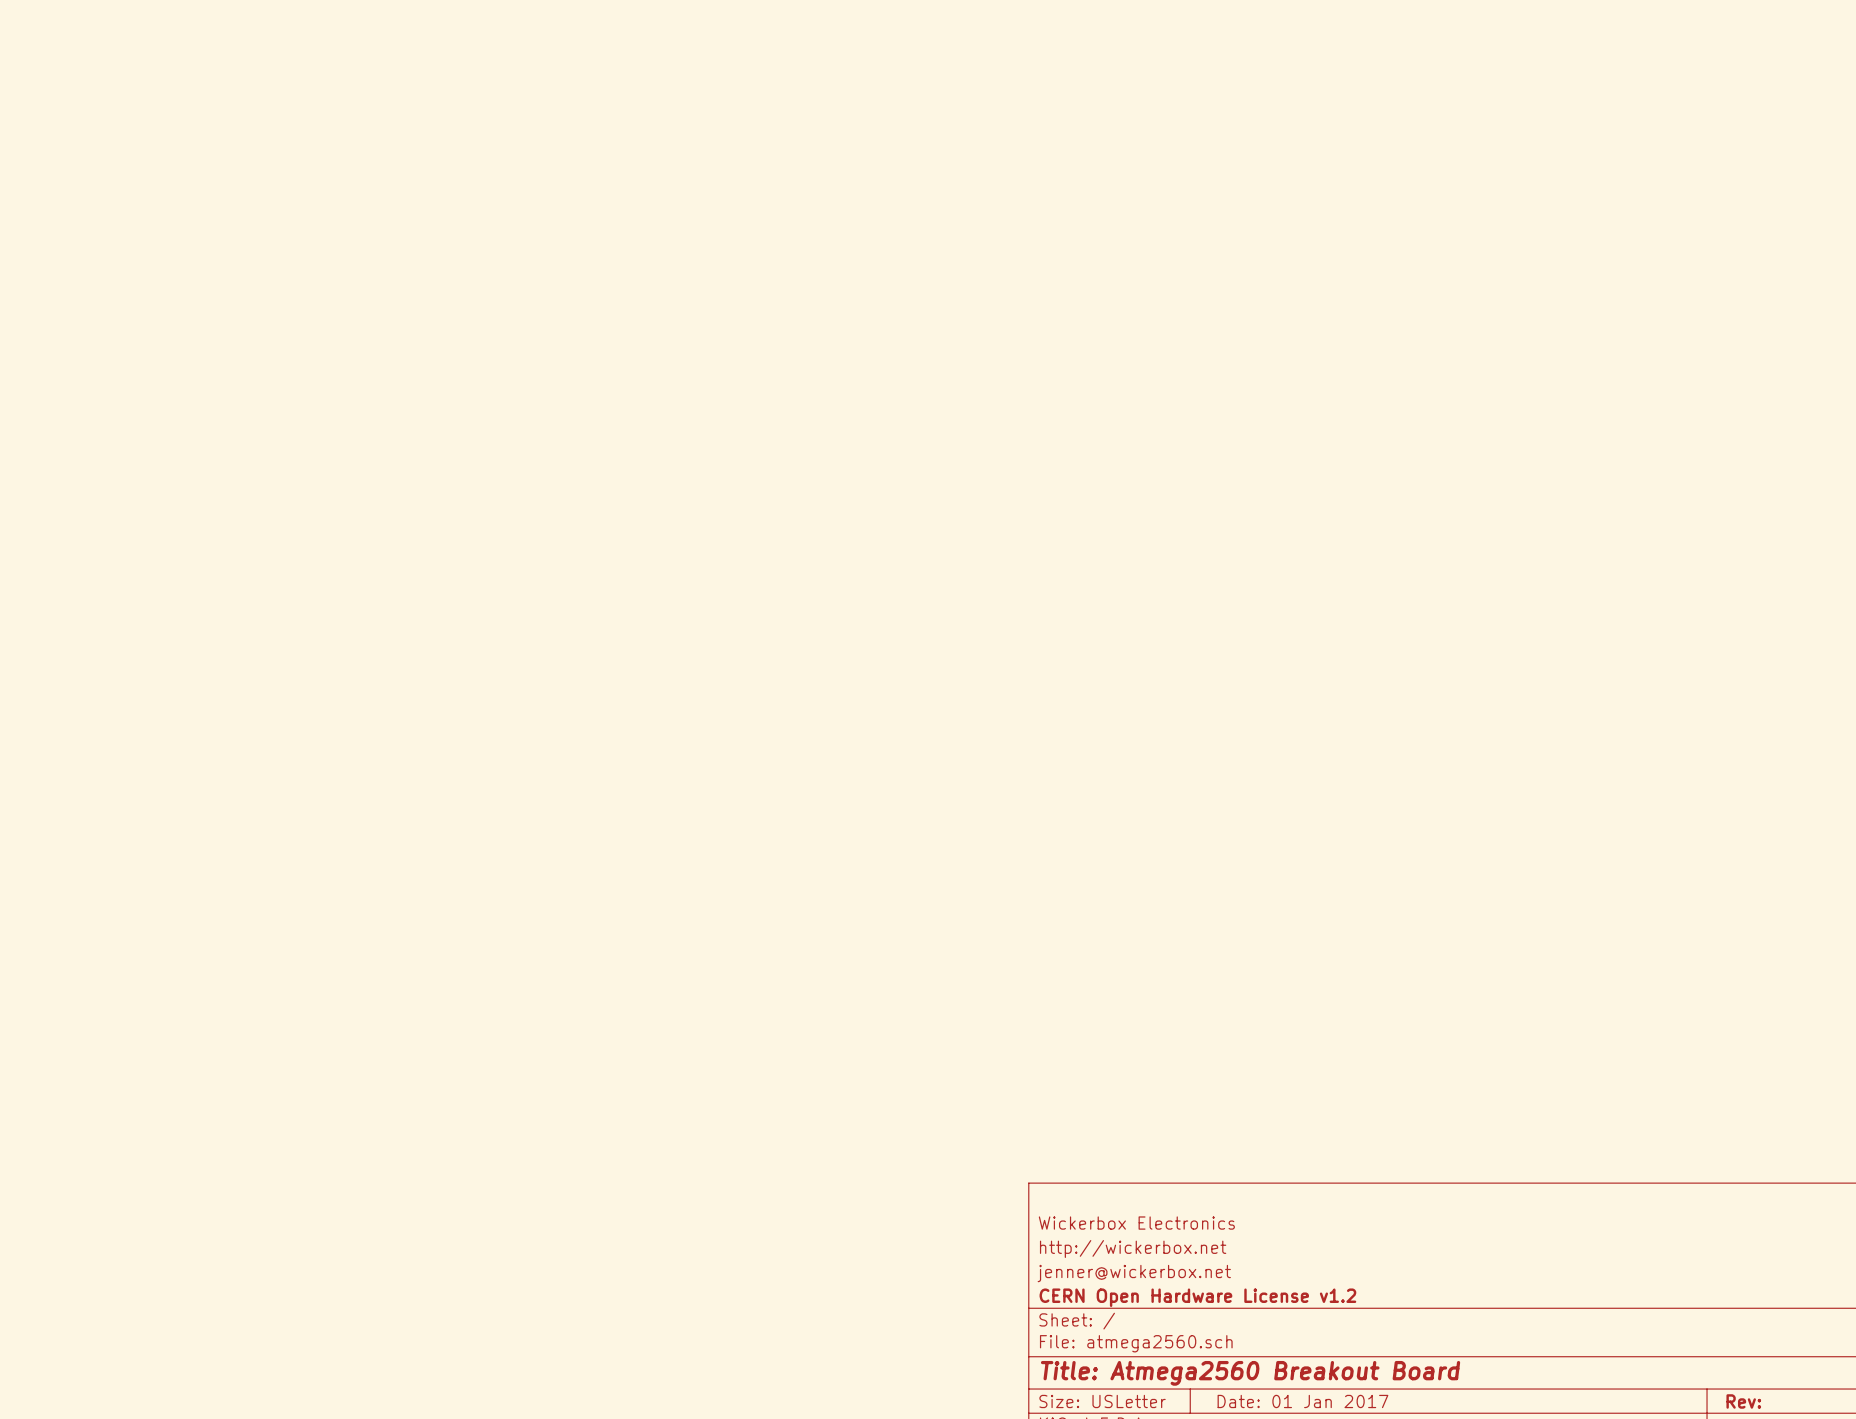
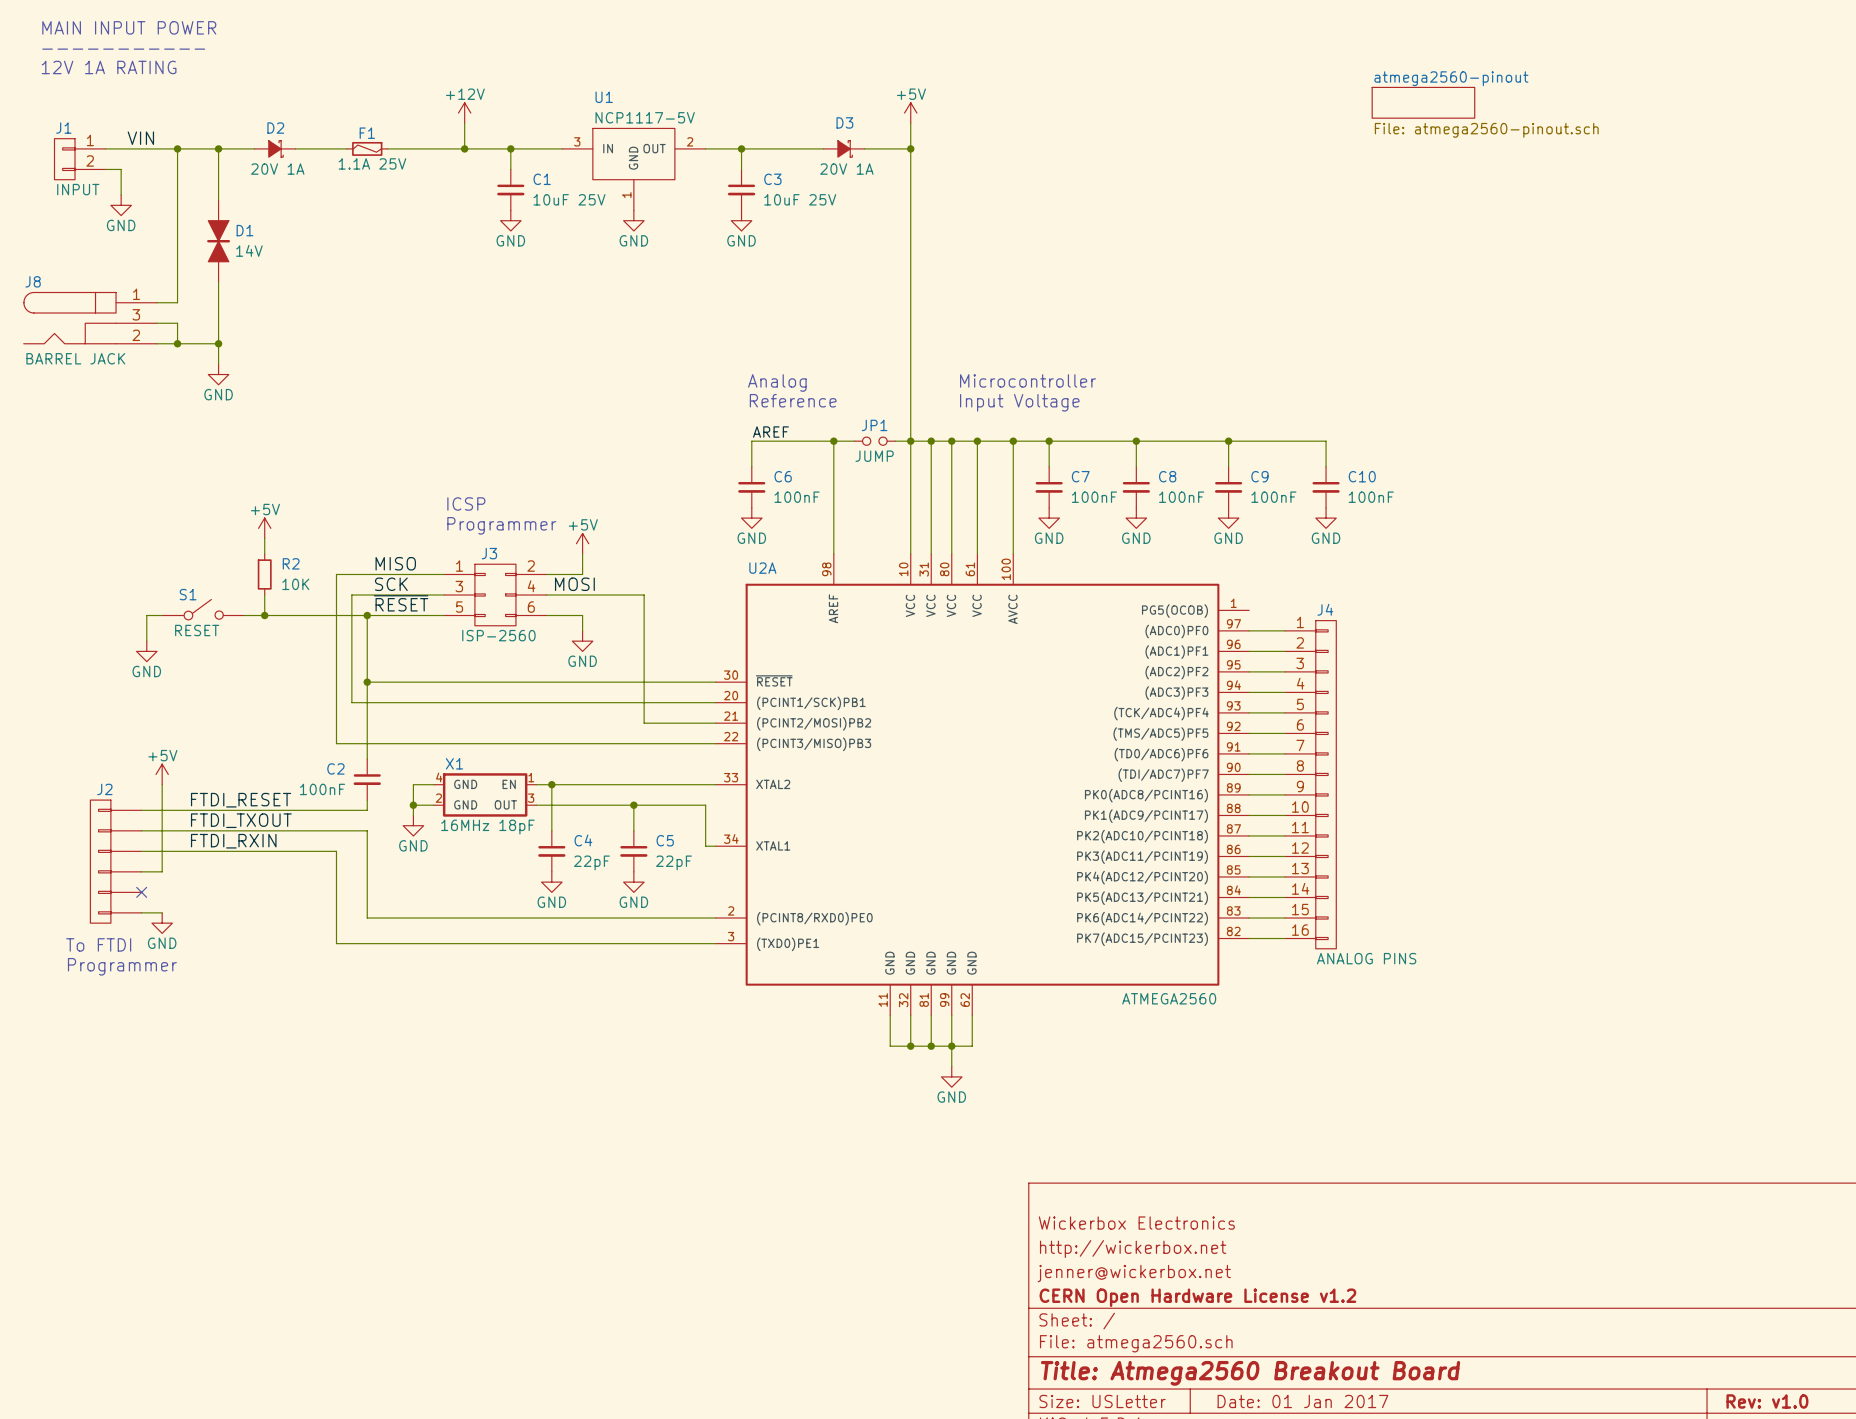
text: none -> MAIN INPUT POWER (129, 27)
text: none -> ----------- (123, 49)
text: none -> 12V 1A RATING (109, 67)
sheet atmega2560-pinout: none -> File: atmega2560-pinout.sch (1423, 102)
power symbol: none -> +12V (464, 113)
power symbol: none -> +5V (910, 113)
wire: none -> (464, 123) (464, 148)
wire: none -> (910, 123) (910, 553)
label: none -> VIN (140, 138)
wire: none -> (105, 148) (254, 148)
wire: none -> (177, 148) (177, 302) (157, 302)
junction: none -> (177, 148)
wire: none -> (218, 148) (218, 200)
junction: none -> (218, 148)
D2: none -> 20V 1A (274, 148)
wire: none -> (295, 148) (346, 148)
F1: none -> 1.1A 25V (367, 148)
wire: none -> (387, 148) (562, 148)
junction: none -> (464, 148)
wire: none -> (510, 148) (510, 169)
junction: none -> (510, 148)
wire: none -> (705, 148) (823, 148)
wire: none -> (741, 148) (741, 169)
junction: none -> (741, 148)
D3: none -> 20V 1A (844, 148)
wire: none -> (864, 148) (910, 148)
junction: none -> (910, 148)
J1: none -> INPUT (80, 159)
wire: none -> (105, 169) (121, 169) (121, 195)
U1: none -> NCP1117-5V (633, 169)
C1: none -> 10uF 25V (510, 189)
C3: none -> 10uF 25V (741, 189)
power symbol: none -> GND (121, 205)
power symbol: none -> GND (510, 220)
power symbol: none -> GND (633, 220)
power symbol: none -> GND (741, 220)
D1: none -> 14V (218, 241)
wire: none -> (218, 282) (218, 364)
J8: none -> BARREL JACK (90, 318)
wire: none -> (157, 323) (177, 323) (177, 343)
wire: none -> (157, 343) (218, 343)
junction: none -> (177, 343)
junction: none -> (218, 343)
power symbol: none -> GND (218, 374)
text: none -> Microcontroller (1028, 380)
text: none -> Analog (777, 382)
text: none -> Reference (793, 400)
text: none -> Input Voltage (1019, 402)
label: none -> AREF (770, 432)
wire: none -> (833, 441) (833, 553)
junction: none -> (833, 441)
wire: none -> (854, 441) (751, 441) (751, 466)
JP1: none -> JUMP (874, 441)
wire: none -> (895, 441) (1326, 441) (1326, 466)
junction: none -> (910, 441)
wire: none -> (931, 441) (931, 553)
junction: none -> (931, 441)
wire: none -> (951, 441) (951, 553)
junction: none -> (951, 441)
wire: none -> (977, 441) (977, 553)
junction: none -> (977, 441)
wire: none -> (1013, 441) (1013, 553)
junction: none -> (1013, 441)
wire: none -> (1049, 441) (1049, 466)
junction: none -> (1049, 441)
wire: none -> (1136, 441) (1136, 466)
junction: none -> (1136, 441)
wire: none -> (1228, 441) (1228, 466)
junction: none -> (1228, 441)
C6: none -> 100nF (751, 487)
C7: none -> 100nF (1049, 487)
C8: none -> 100nF (1136, 487)
C9: none -> 100nF (1228, 487)
C10: none -> 100nF (1326, 487)
text: none -> ICSP (466, 503)
power symbol: none -> GND (751, 518)
power symbol: none -> GND (1049, 518)
power symbol: none -> GND (1136, 518)
power symbol: none -> GND (1228, 518)
power symbol: none -> GND (1326, 518)
text: none -> Programmer (501, 525)
power symbol: none -> +5V (264, 528)
wire: none -> (264, 538) (264, 553)
power symbol: none -> +5V (582, 543)
wire: none -> (582, 553) (582, 574) (546, 574)
label: none -> MISO (395, 563)
R2: none -> 10K (264, 574)
wire: none -> (444, 574) (336, 574) (336, 743) (715, 743)
label: none -> SCK (391, 584)
label: none -> MOSI (574, 584)
wire: none -> (264, 595) (264, 615)
wire: none -> (444, 595) (351, 595) (351, 702) (715, 702)
J3: none -> ISP-2560 (495, 595)
wire: none -> (546, 595) (644, 595) (644, 723) (715, 723)
label: none -> ~{RESET} (401, 603)
S1: none -> RESET (203, 609)
wire: none -> (162, 615) (146, 615) (146, 641)
wire: none -> (244, 615) (444, 615)
junction: none -> (264, 615)
wire: none -> (367, 615) (367, 759)
junction: none -> (367, 615)
wire: none -> (546, 615) (582, 615) (582, 630)
wire: none -> (1249, 630) (1285, 630)
power symbol: none -> GND (582, 641)
power symbol: none -> GND (146, 651)
wire: none -> (1249, 651) (1285, 651)
wire: none -> (1249, 671) (1285, 671)
wire: none -> (367, 682) (715, 682)
junction: none -> (367, 682)
wire: none -> (1249, 692) (1285, 692)
wire: none -> (1249, 712) (1285, 712)
wire: none -> (1249, 733) (1285, 733)
wire: none -> (1249, 753) (1285, 753)
power symbol: none -> +5V (162, 774)
wire: none -> (1249, 774) (1285, 774)
C2: none -> 100nF (367, 779)
wire: none -> (162, 784) (162, 871) (141, 871)
wire: none -> (433, 784) (413, 784) (413, 815)
wire: none -> (536, 784) (715, 784)
wire: none -> (551, 784) (551, 830)
junction: none -> (551, 784)
U2A: none -> ATMEGA2560 (982, 784)
J4: none -> ANALOG PINS (1310, 784)
X1: none -> 16MHz 18pF (485, 794)
wire: none -> (1249, 794) (1285, 794)
label: none -> FTDI_RESET (241, 800)
wire: none -> (367, 800) (367, 810) (141, 810)
wire: none -> (413, 805) (433, 805)
junction: none -> (413, 805)
wire: none -> (536, 805) (705, 805) (705, 846) (715, 846)
wire: none -> (633, 805) (633, 830)
junction: none -> (633, 805)
wire: none -> (1249, 815) (1285, 815)
label: none -> FTDI_TXOUT (241, 820)
power symbol: none -> GND (413, 825)
wire: none -> (141, 830) (367, 830) (367, 918) (715, 918)
wire: none -> (1249, 835) (1285, 835)
label: none -> FTDI_RXIN (233, 841)
wire: none -> (141, 851) (336, 851) (336, 943) (715, 943)
C4: none -> 22pF (551, 851)
C5: none -> 22pF (633, 851)
wire: none -> (1249, 856) (1285, 856)
J2: none -> (116, 861)
wire: none -> (1249, 876) (1285, 876)
power symbol: none -> GND (551, 882)
power symbol: none -> GND (633, 882)
no-connect mark: none -> (141, 892)
wire: none -> (1249, 897) (1285, 897)
wire: none -> (141, 912) (162, 912)
wire: none -> (1249, 918) (1285, 918)
power symbol: none -> GND (162, 923)
wire: none -> (1249, 938) (1285, 938)
text: none -> To FTDI (98, 944)
text: none -> Programmer (122, 966)
wire: none -> (890, 1015) (890, 1046) (972, 1046) (972, 1015)
wire: none -> (910, 1015) (910, 1046)
wire: none -> (931, 1015) (931, 1046)
wire: none -> (951, 1015) (951, 1066)
junction: none -> (910, 1046)
junction: none -> (931, 1046)
junction: none -> (951, 1046)
power symbol: none -> GND (951, 1076)
title block: Rev: (1743, 1401) -> Rev: v1.0 (1767, 1401)

